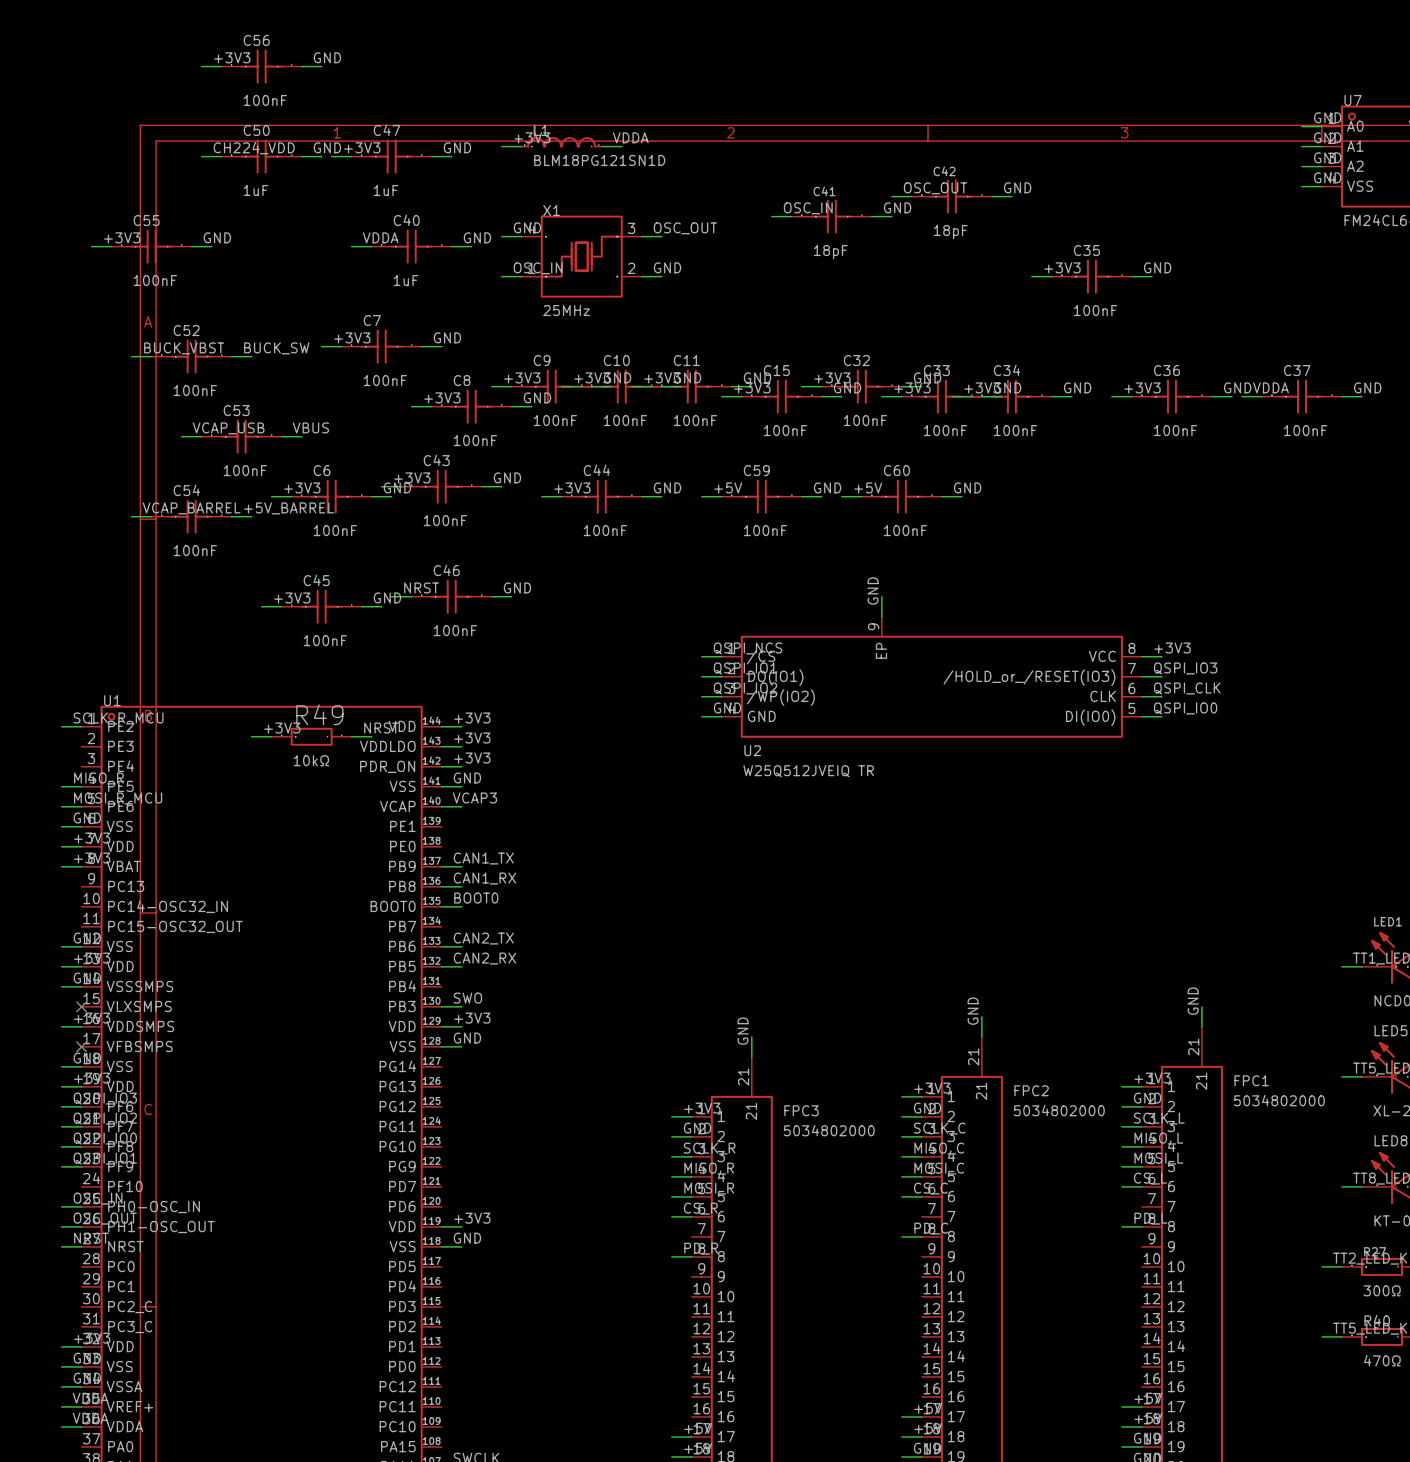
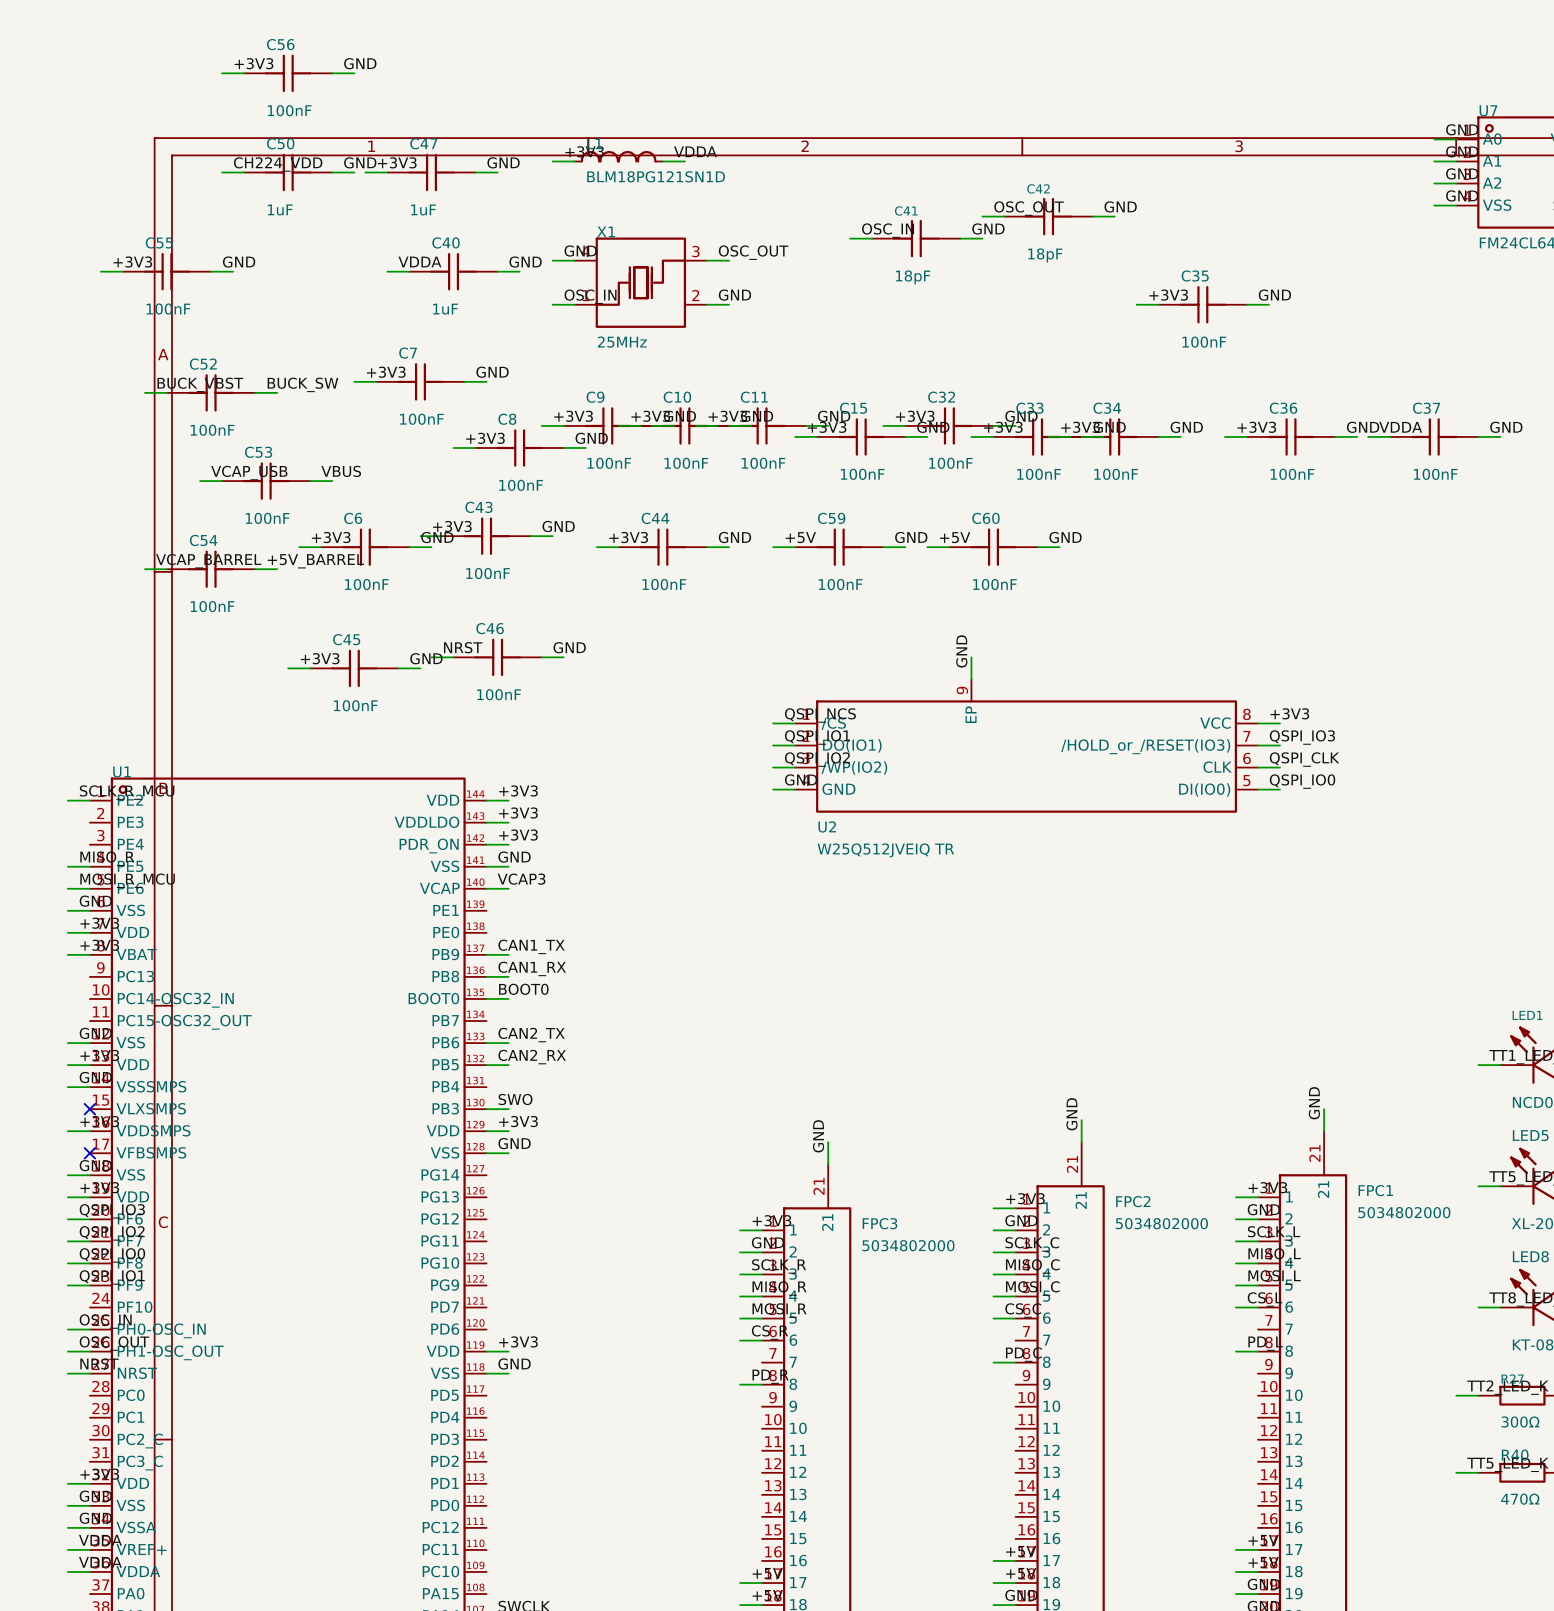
label: +3V3 (282, 728) -> none
label: NRST (381, 728) -> none
wire: (251, 736) (271, 736) -> none
R49: 10kΩ (311, 736) -> none
wire: (351, 736) (371, 736) -> none

